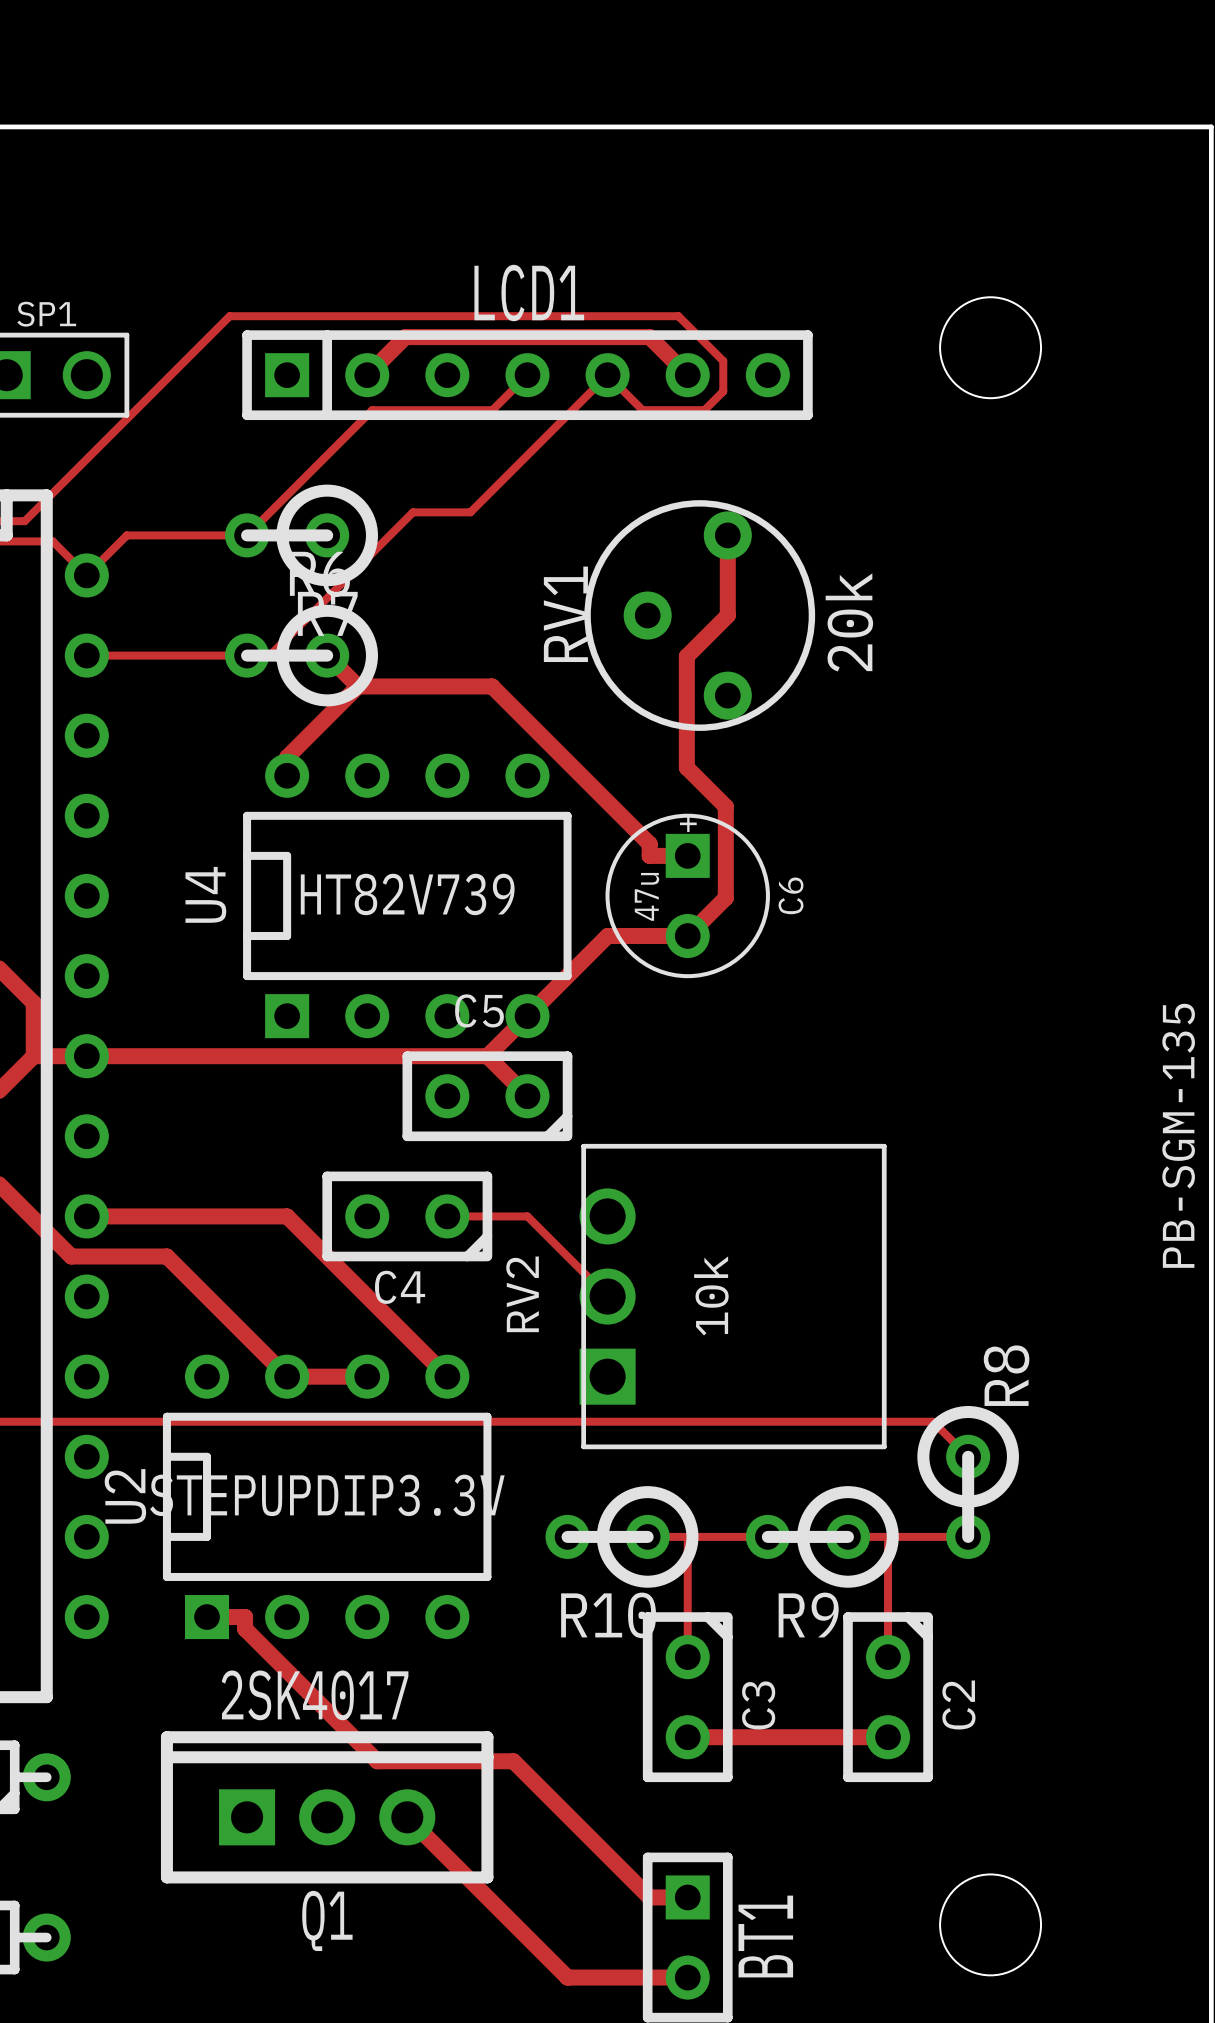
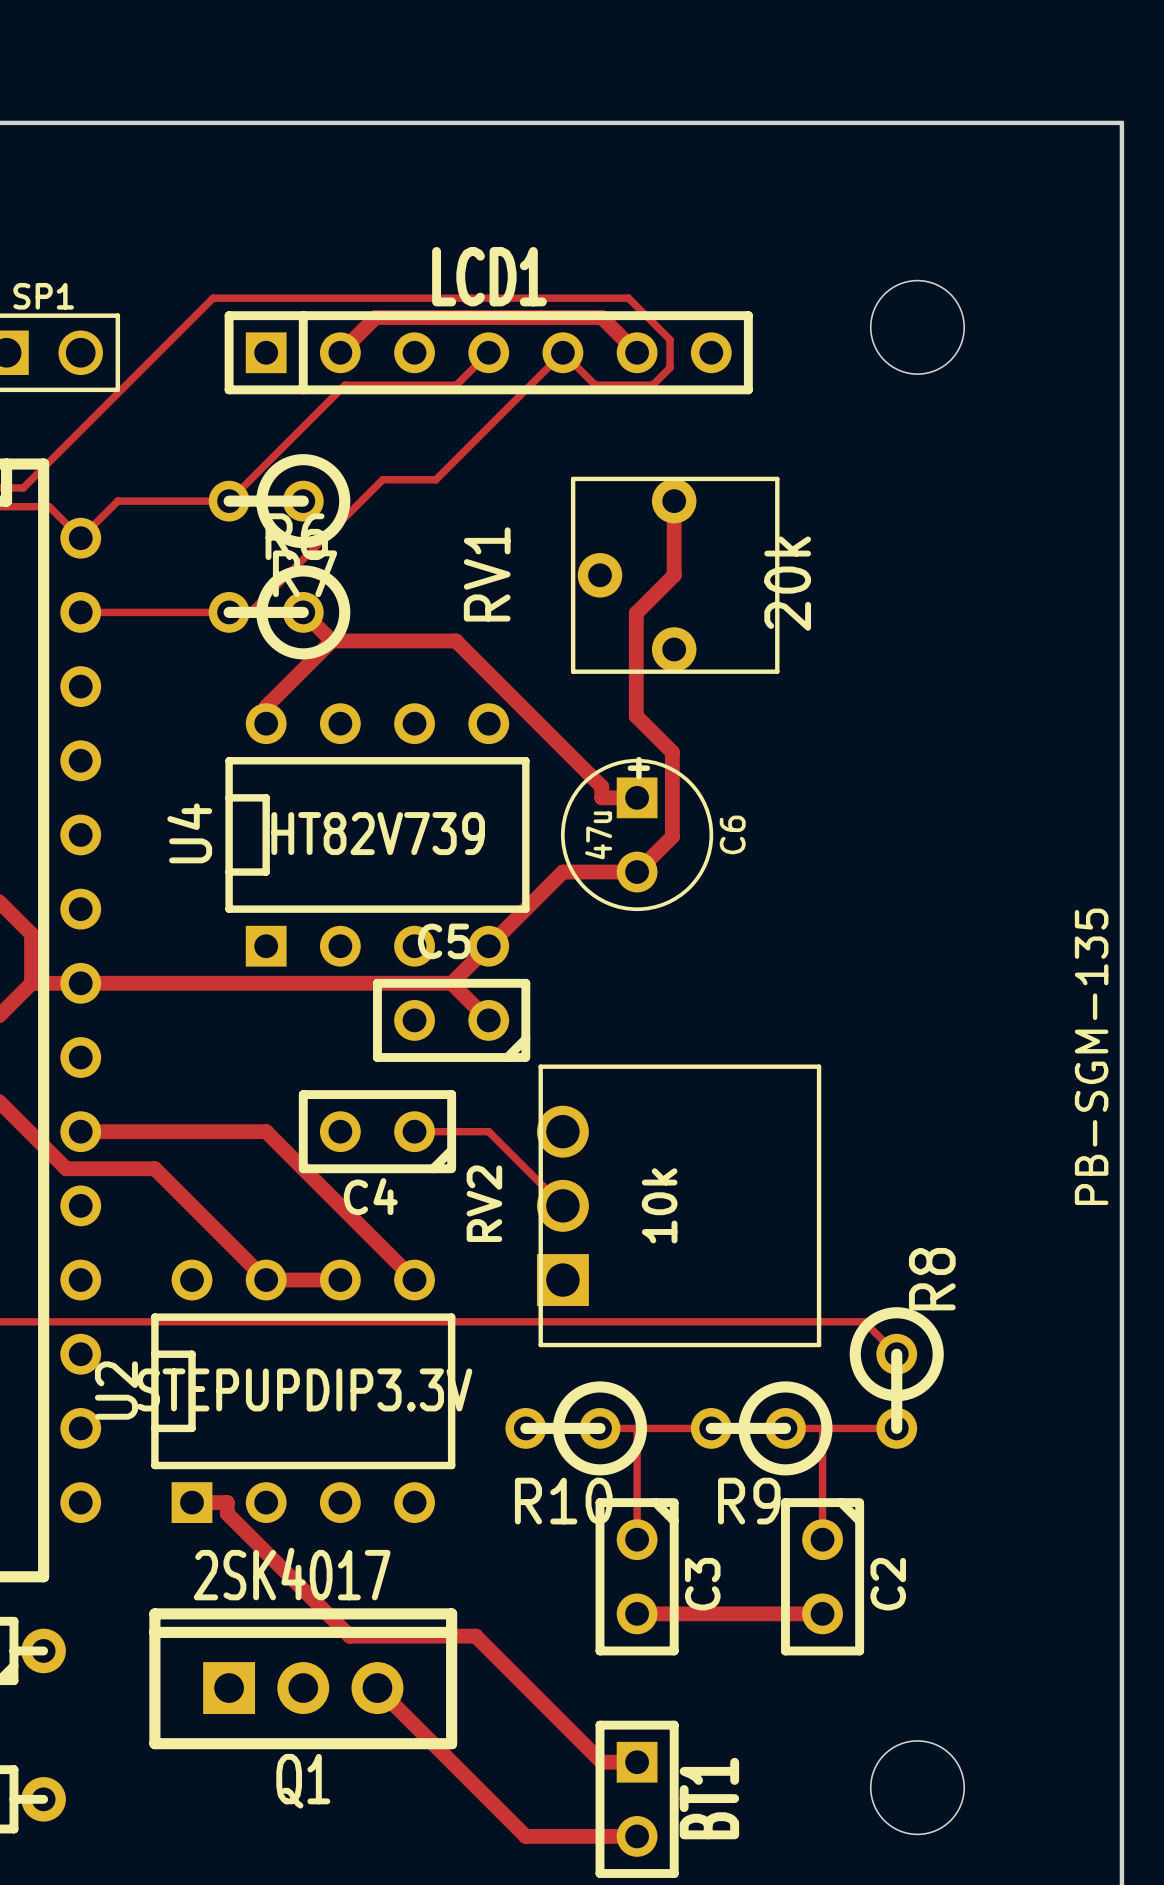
RV1 footprint: [584, 500, 816, 731] -> [570, 476, 780, 674]
RV1 name position: RV1 (565, 614) -> RV1 (487, 574)

